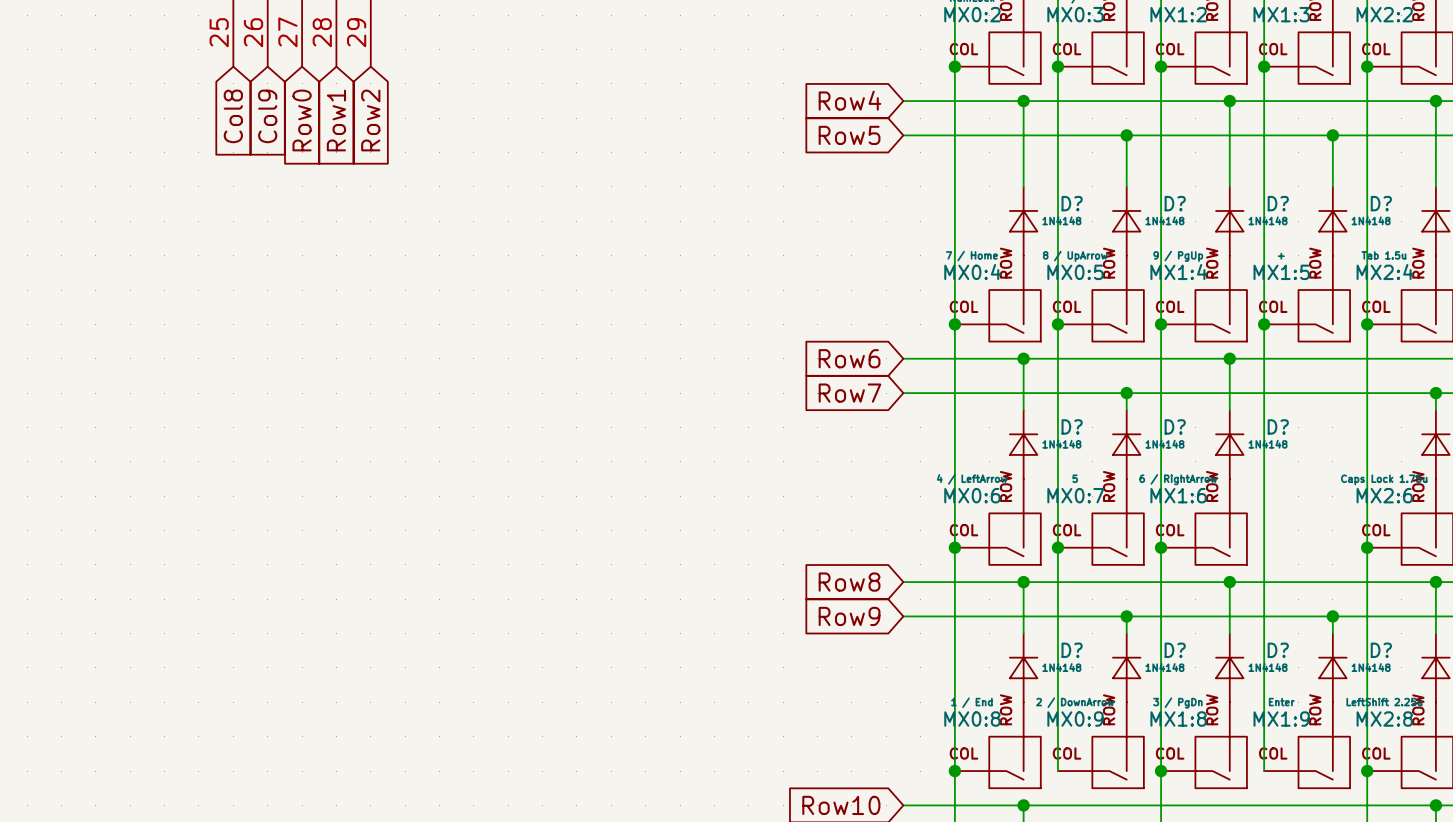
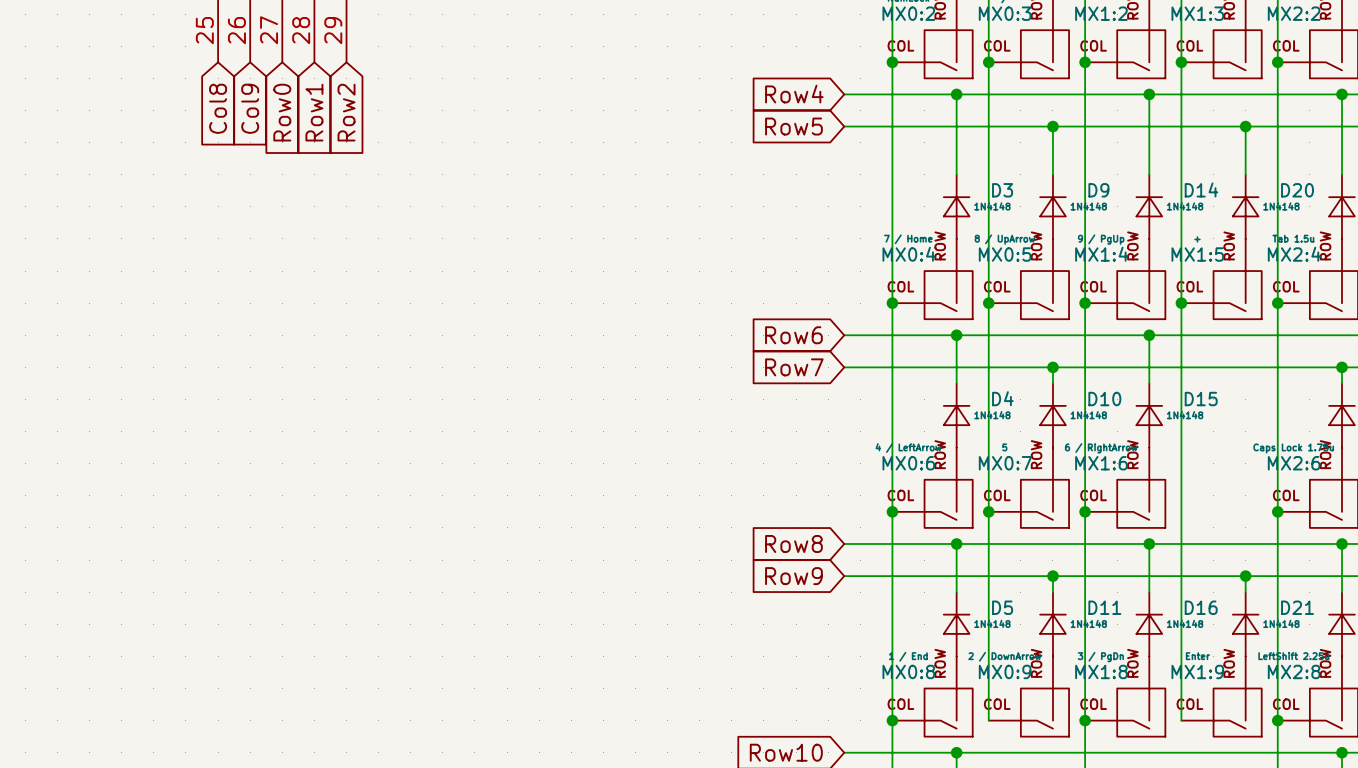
D? name: D? (1072, 203) -> D3 (1002, 190)
D? name: D? (1175, 203) -> D9 (1098, 190)
D? name: D? (1278, 203) -> D14 (1201, 189)
D? name: D? (1381, 203) -> D20 (1297, 190)
D? name: D? (1072, 426) -> D4 (1002, 398)
D? name: D? (1175, 426) -> D10 (1104, 399)
D? name: D? (1278, 426) -> D15 (1201, 399)
D? name: D? (1072, 650) -> D5 (1002, 607)
D? name: D? (1175, 650) -> D11 (1104, 607)
D? name: D? (1278, 650) -> D16 (1201, 607)
D? name: D? (1381, 650) -> D21 (1297, 607)

